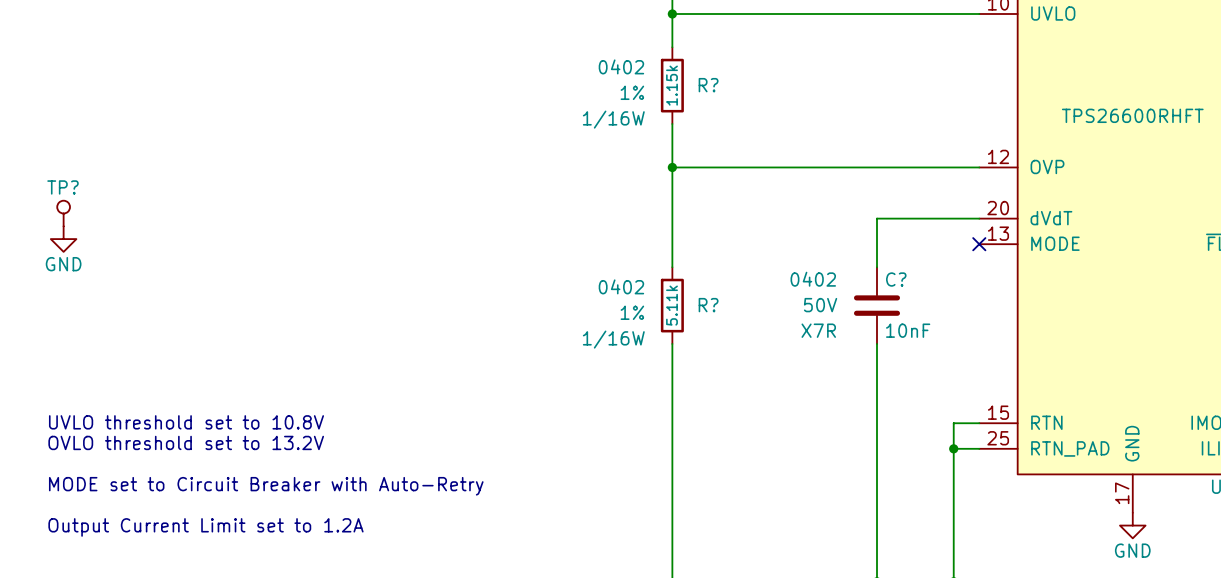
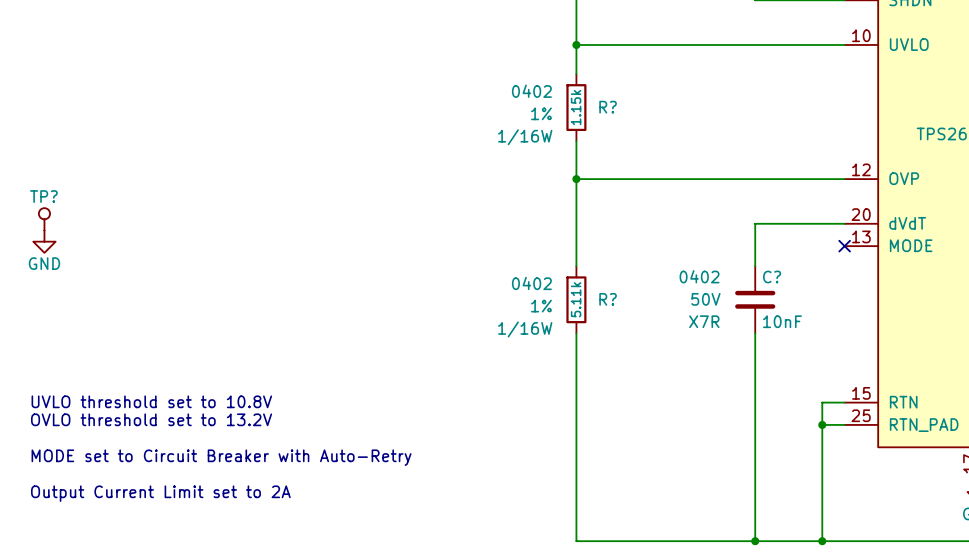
text: Output Current Limit set to 1.2A (205, 527) -> Output Current Limit set to 2A (160, 493)

